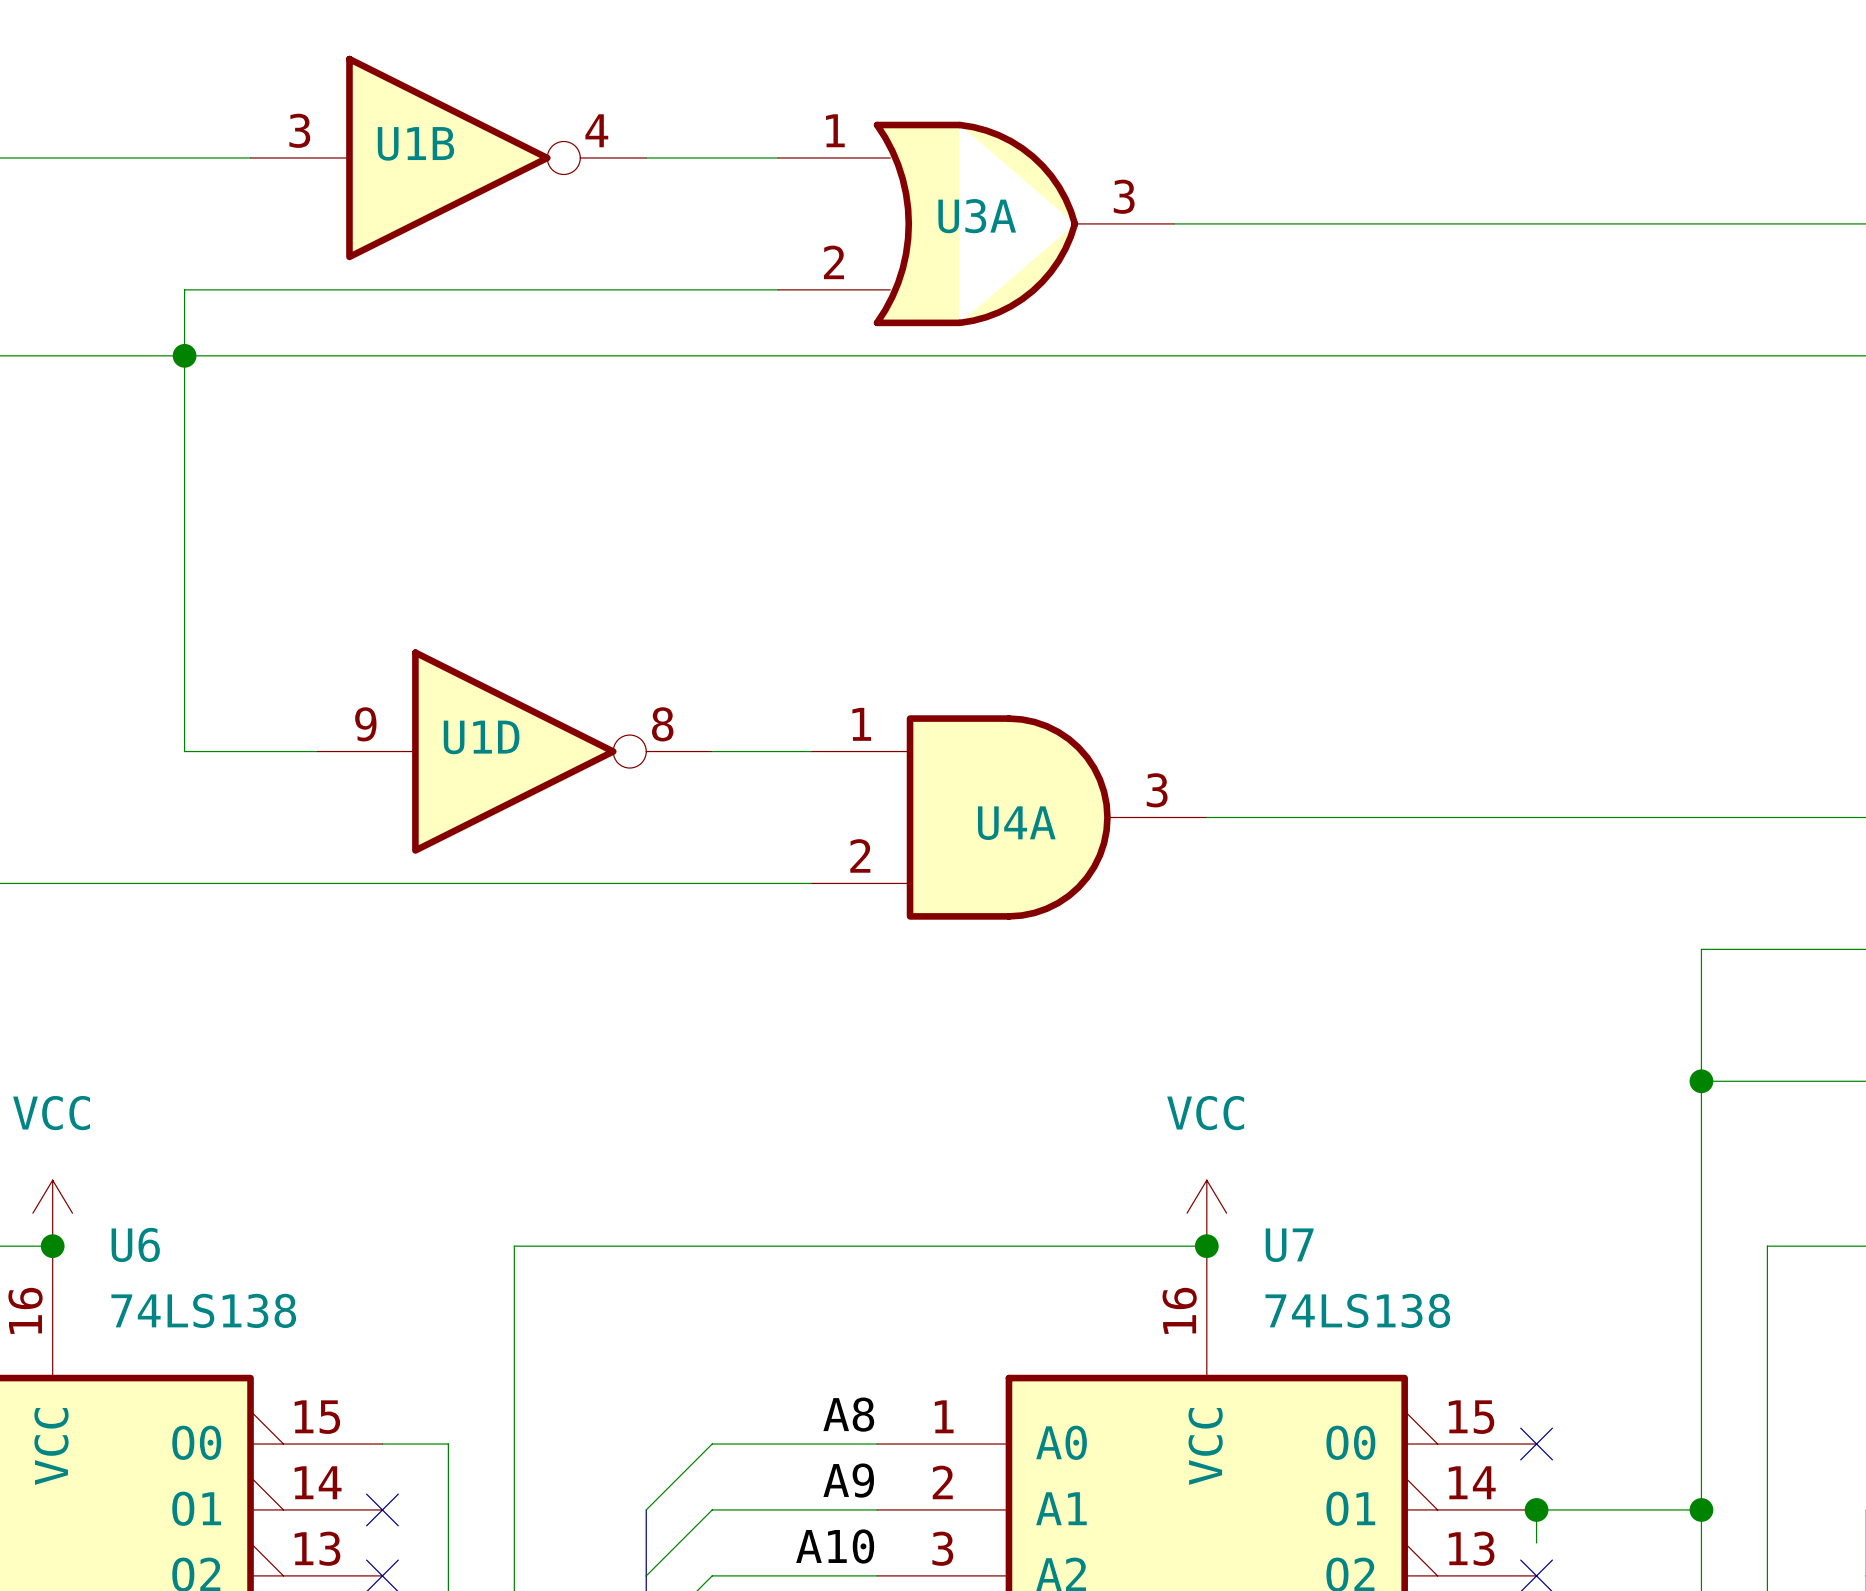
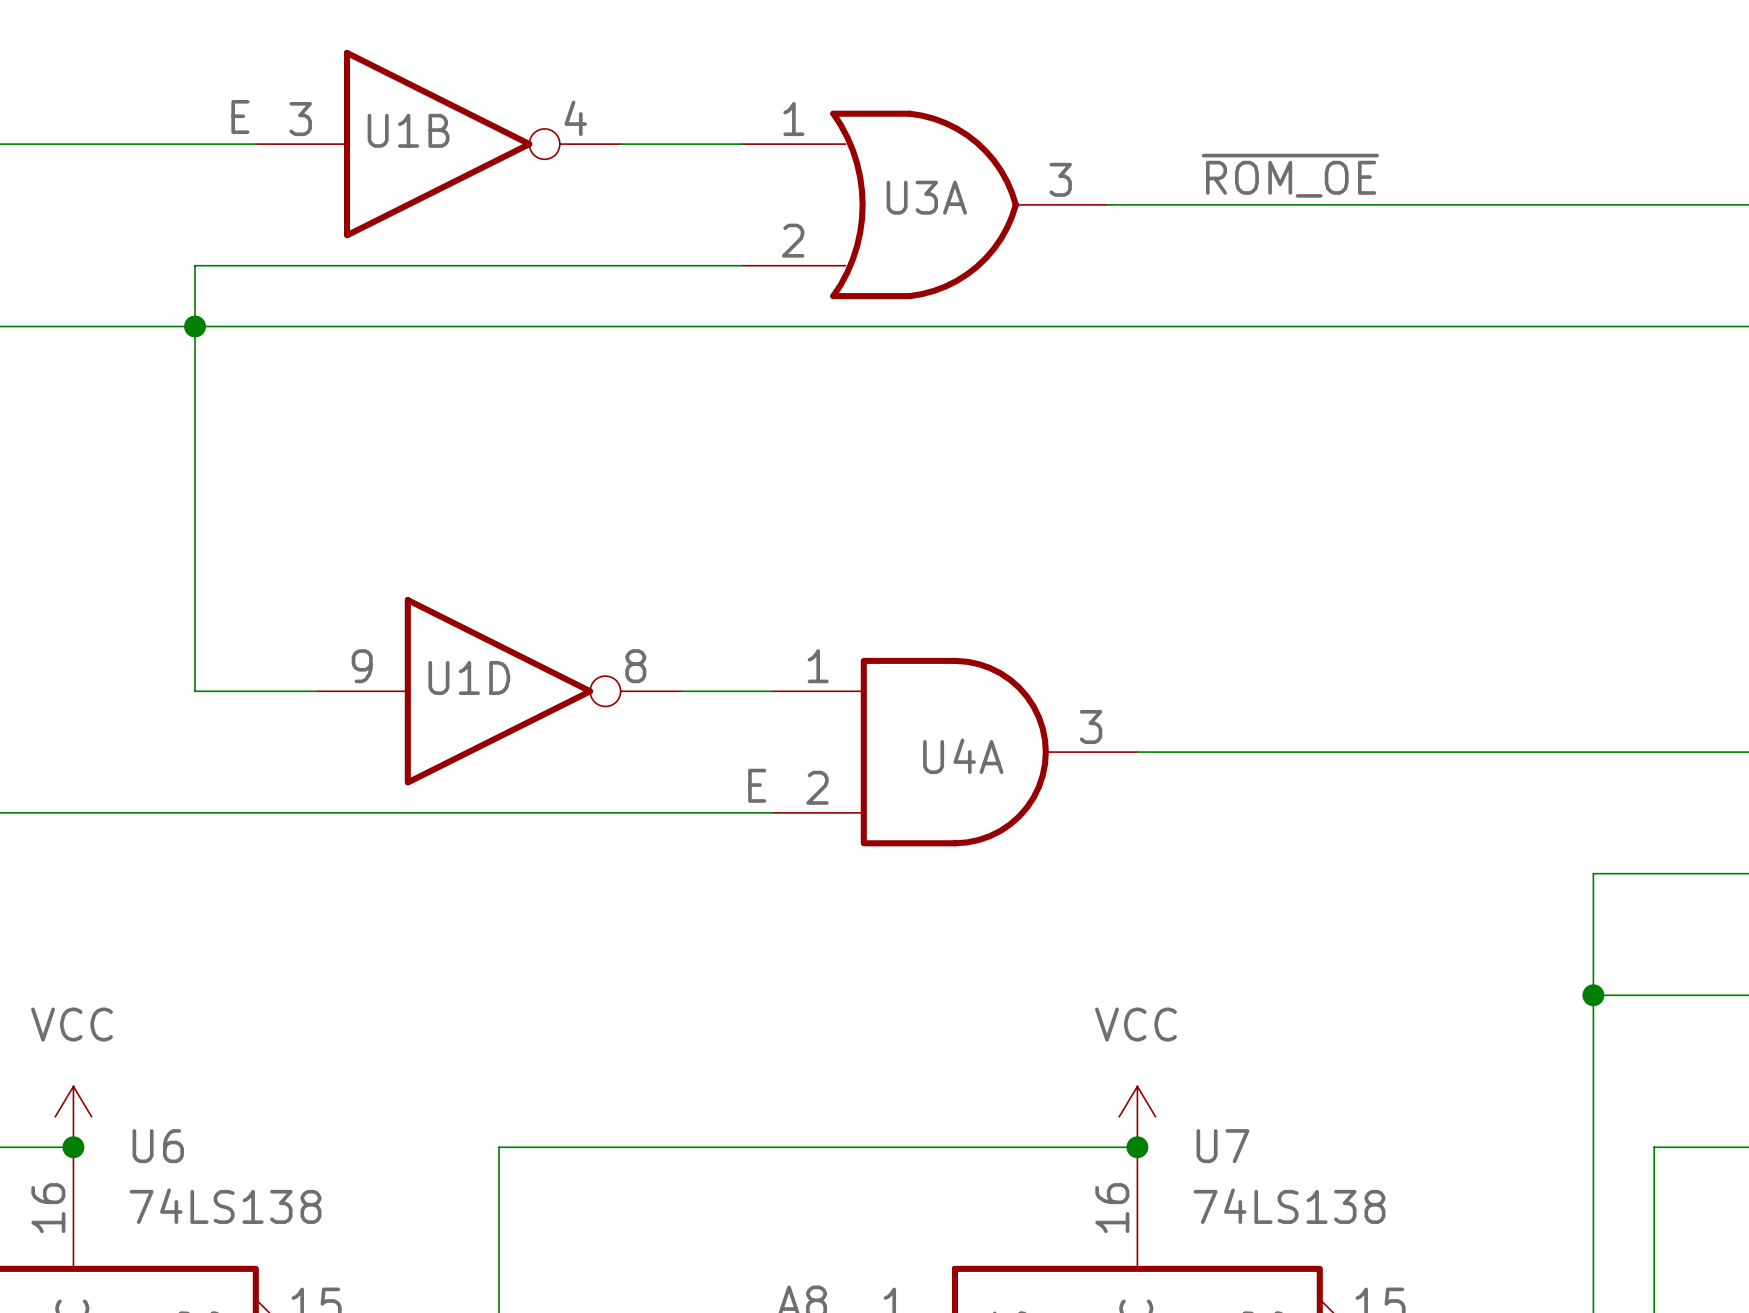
label: none -> E (240, 116)
label: none -> ~{ROM_OE} (1290, 175)
label: none -> E (757, 785)

